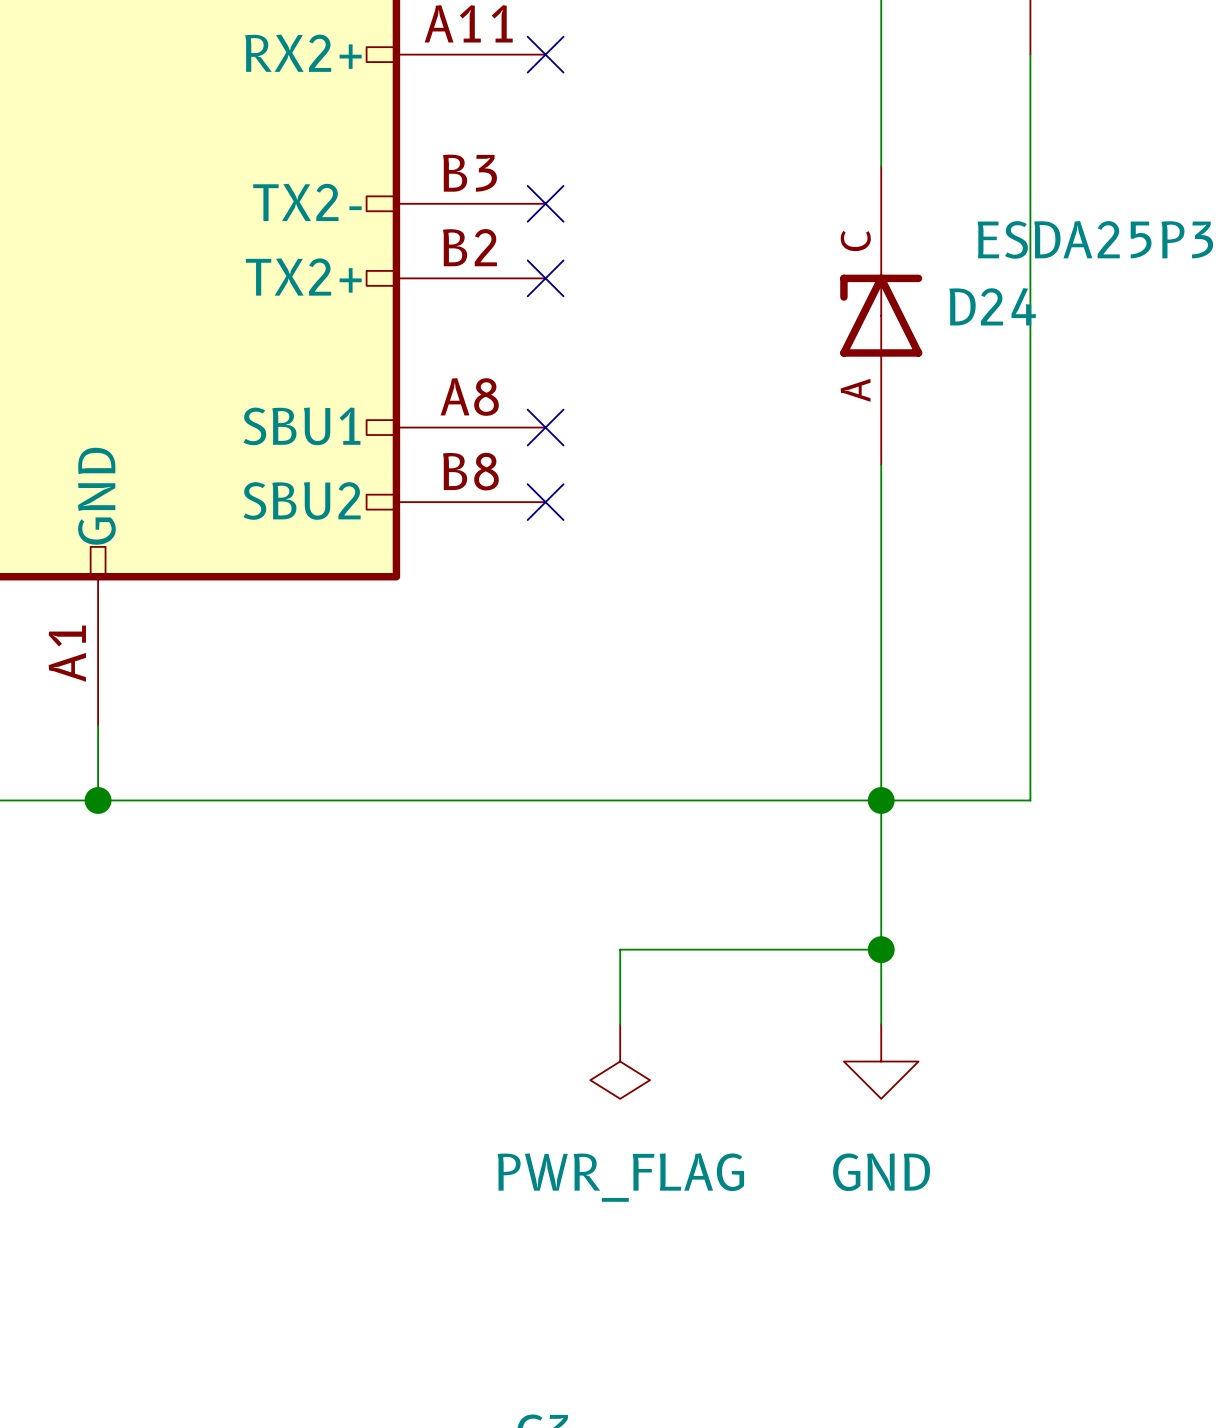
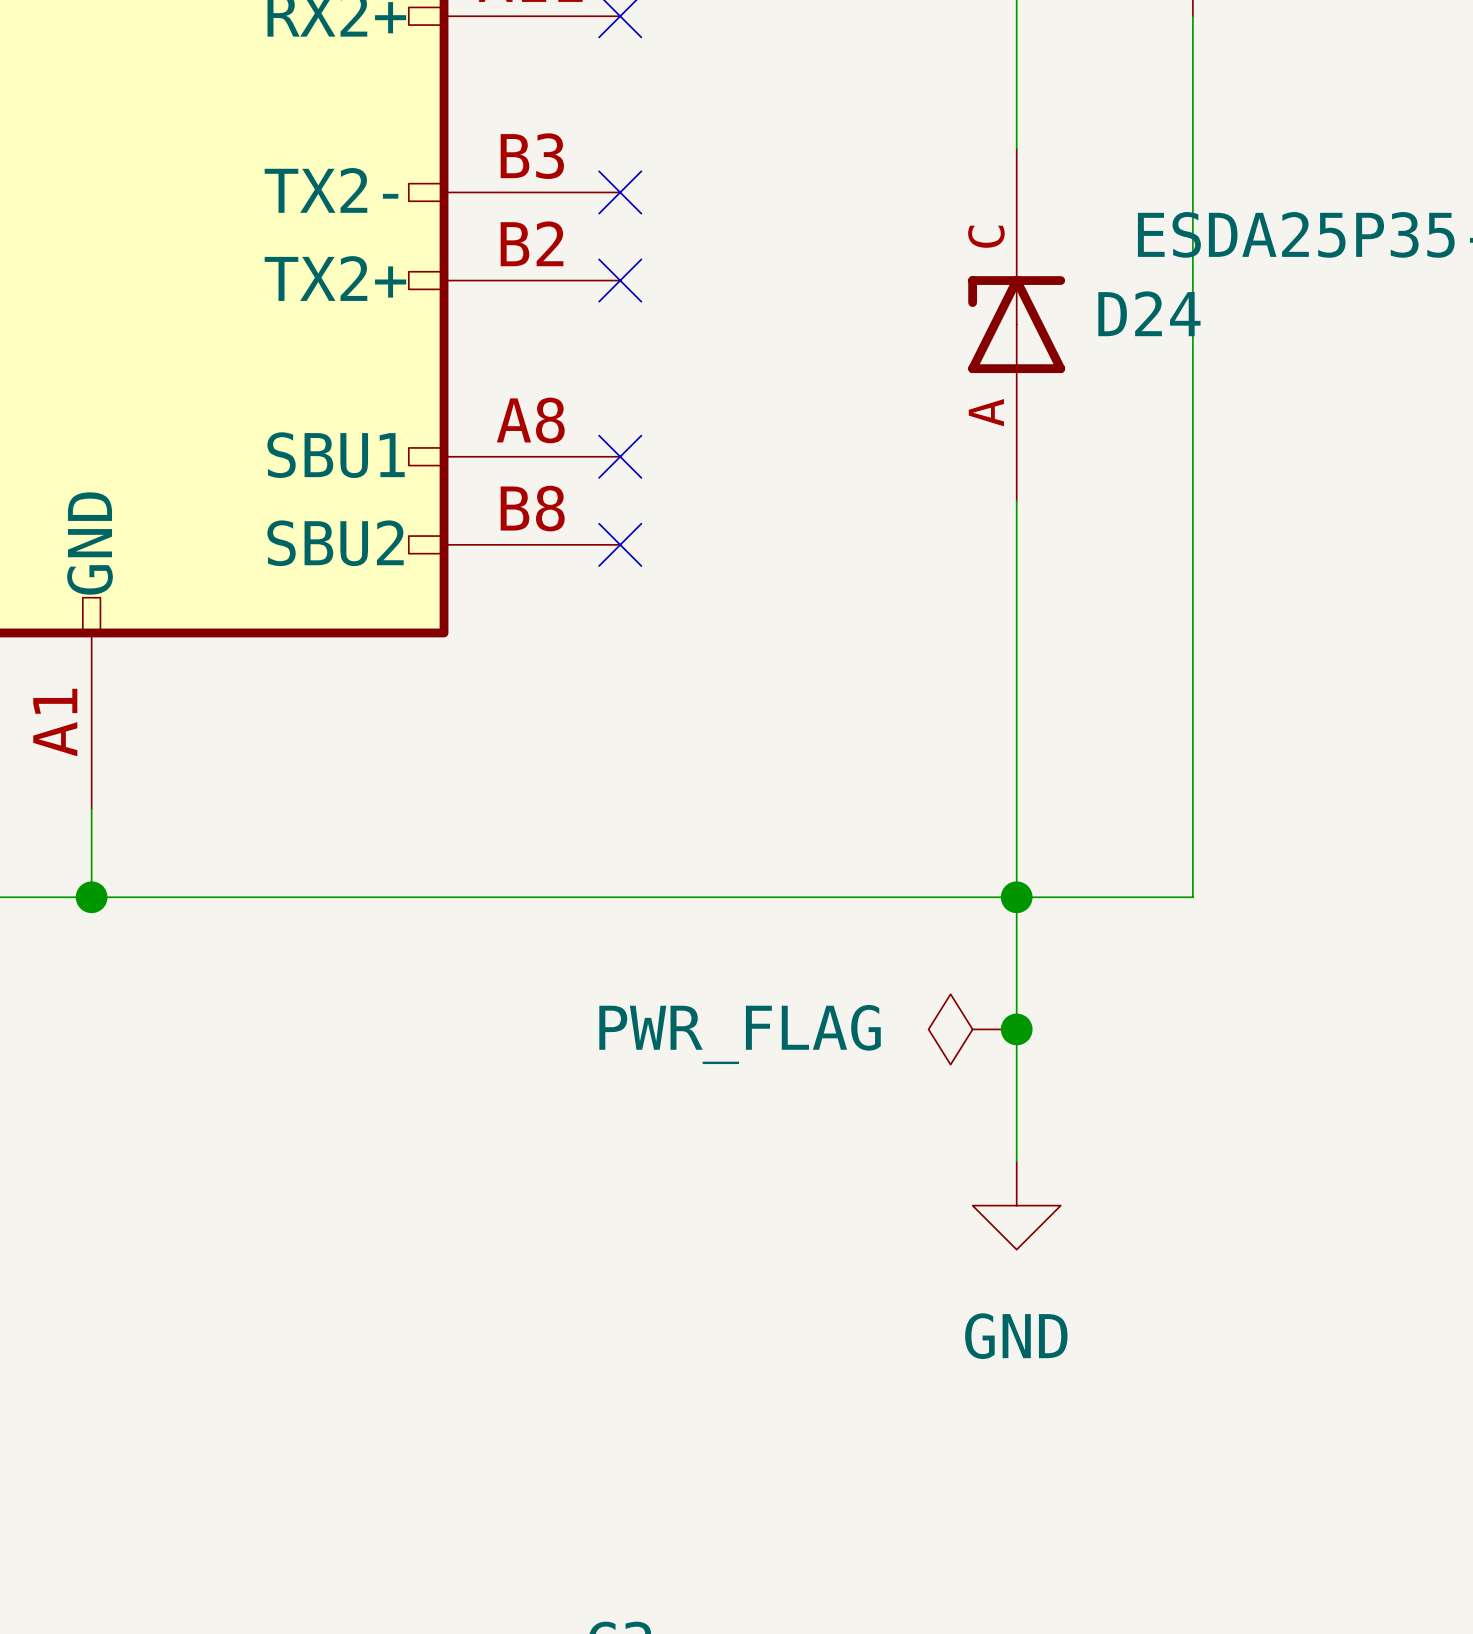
wire: (881, 949) (620, 949) (620, 1024) -> none
junction position: (881, 949) -> (1016, 1029)
power symbol rotation: 0° (620, 1061) -> 90° clockwise (972, 1029)
power symbol position: PWR_FLAG (620, 1061) -> PWR_FLAG (972, 1029)
power symbol text position: PWR_FLAG (620, 1177) -> PWR_FLAG (740, 1034)

